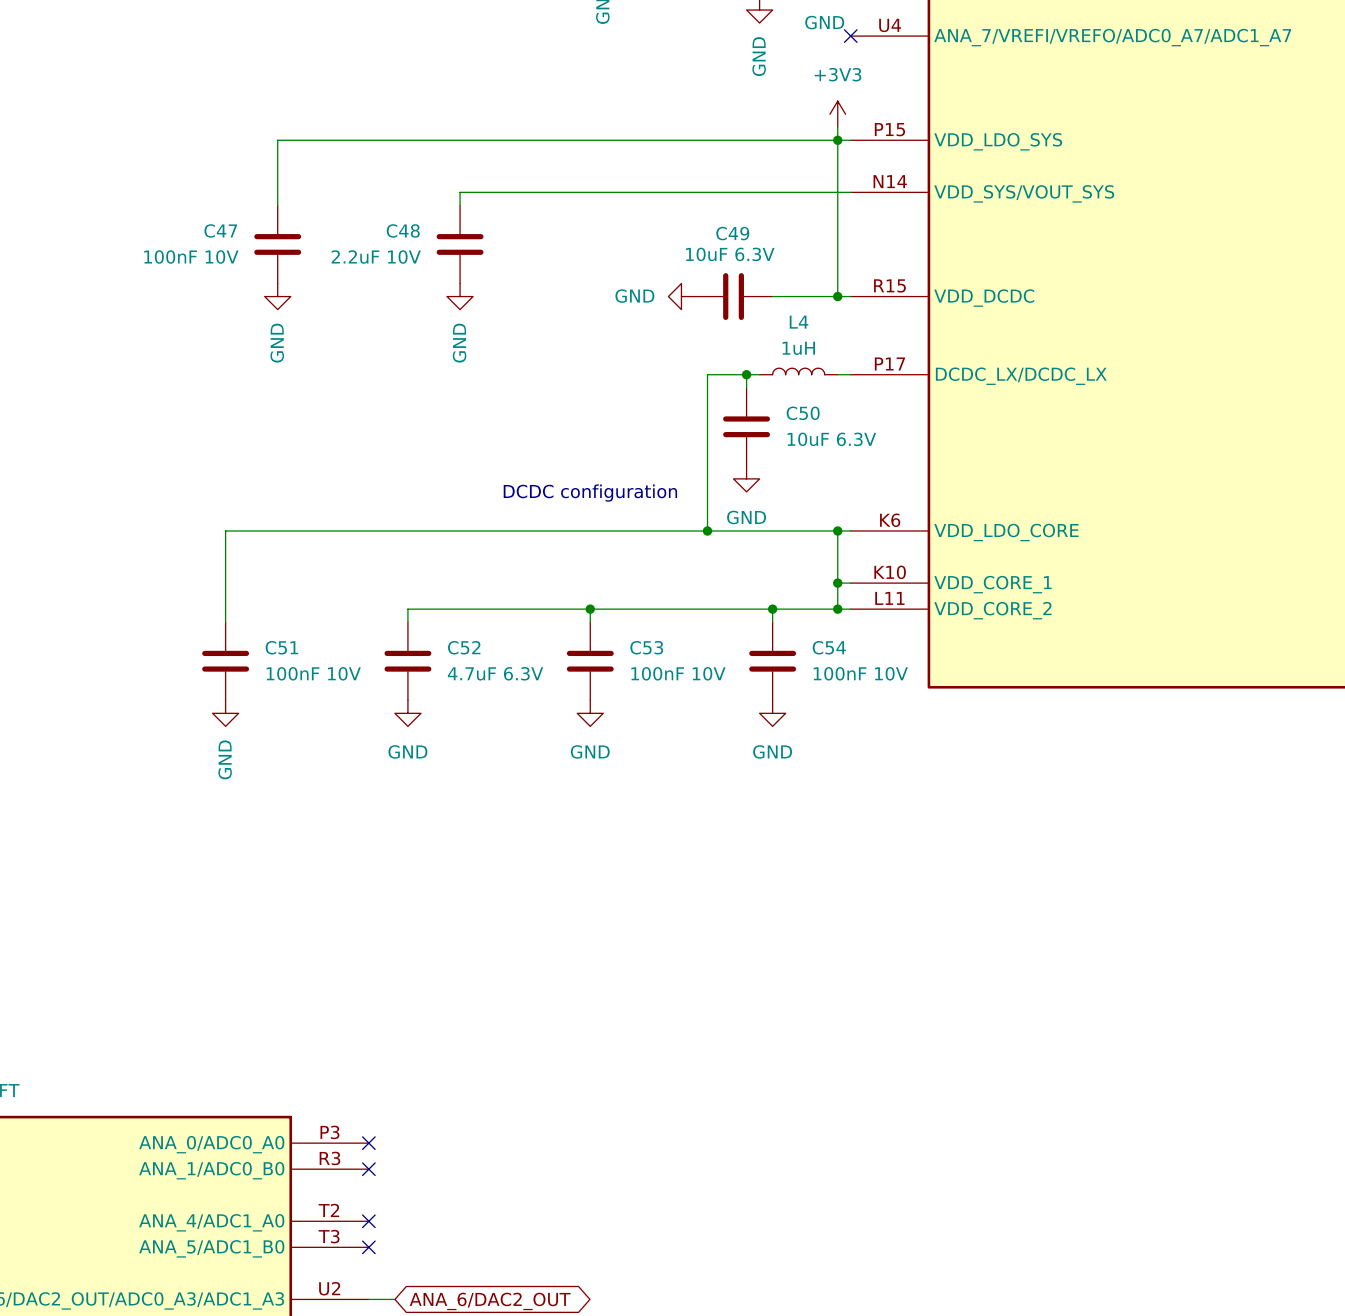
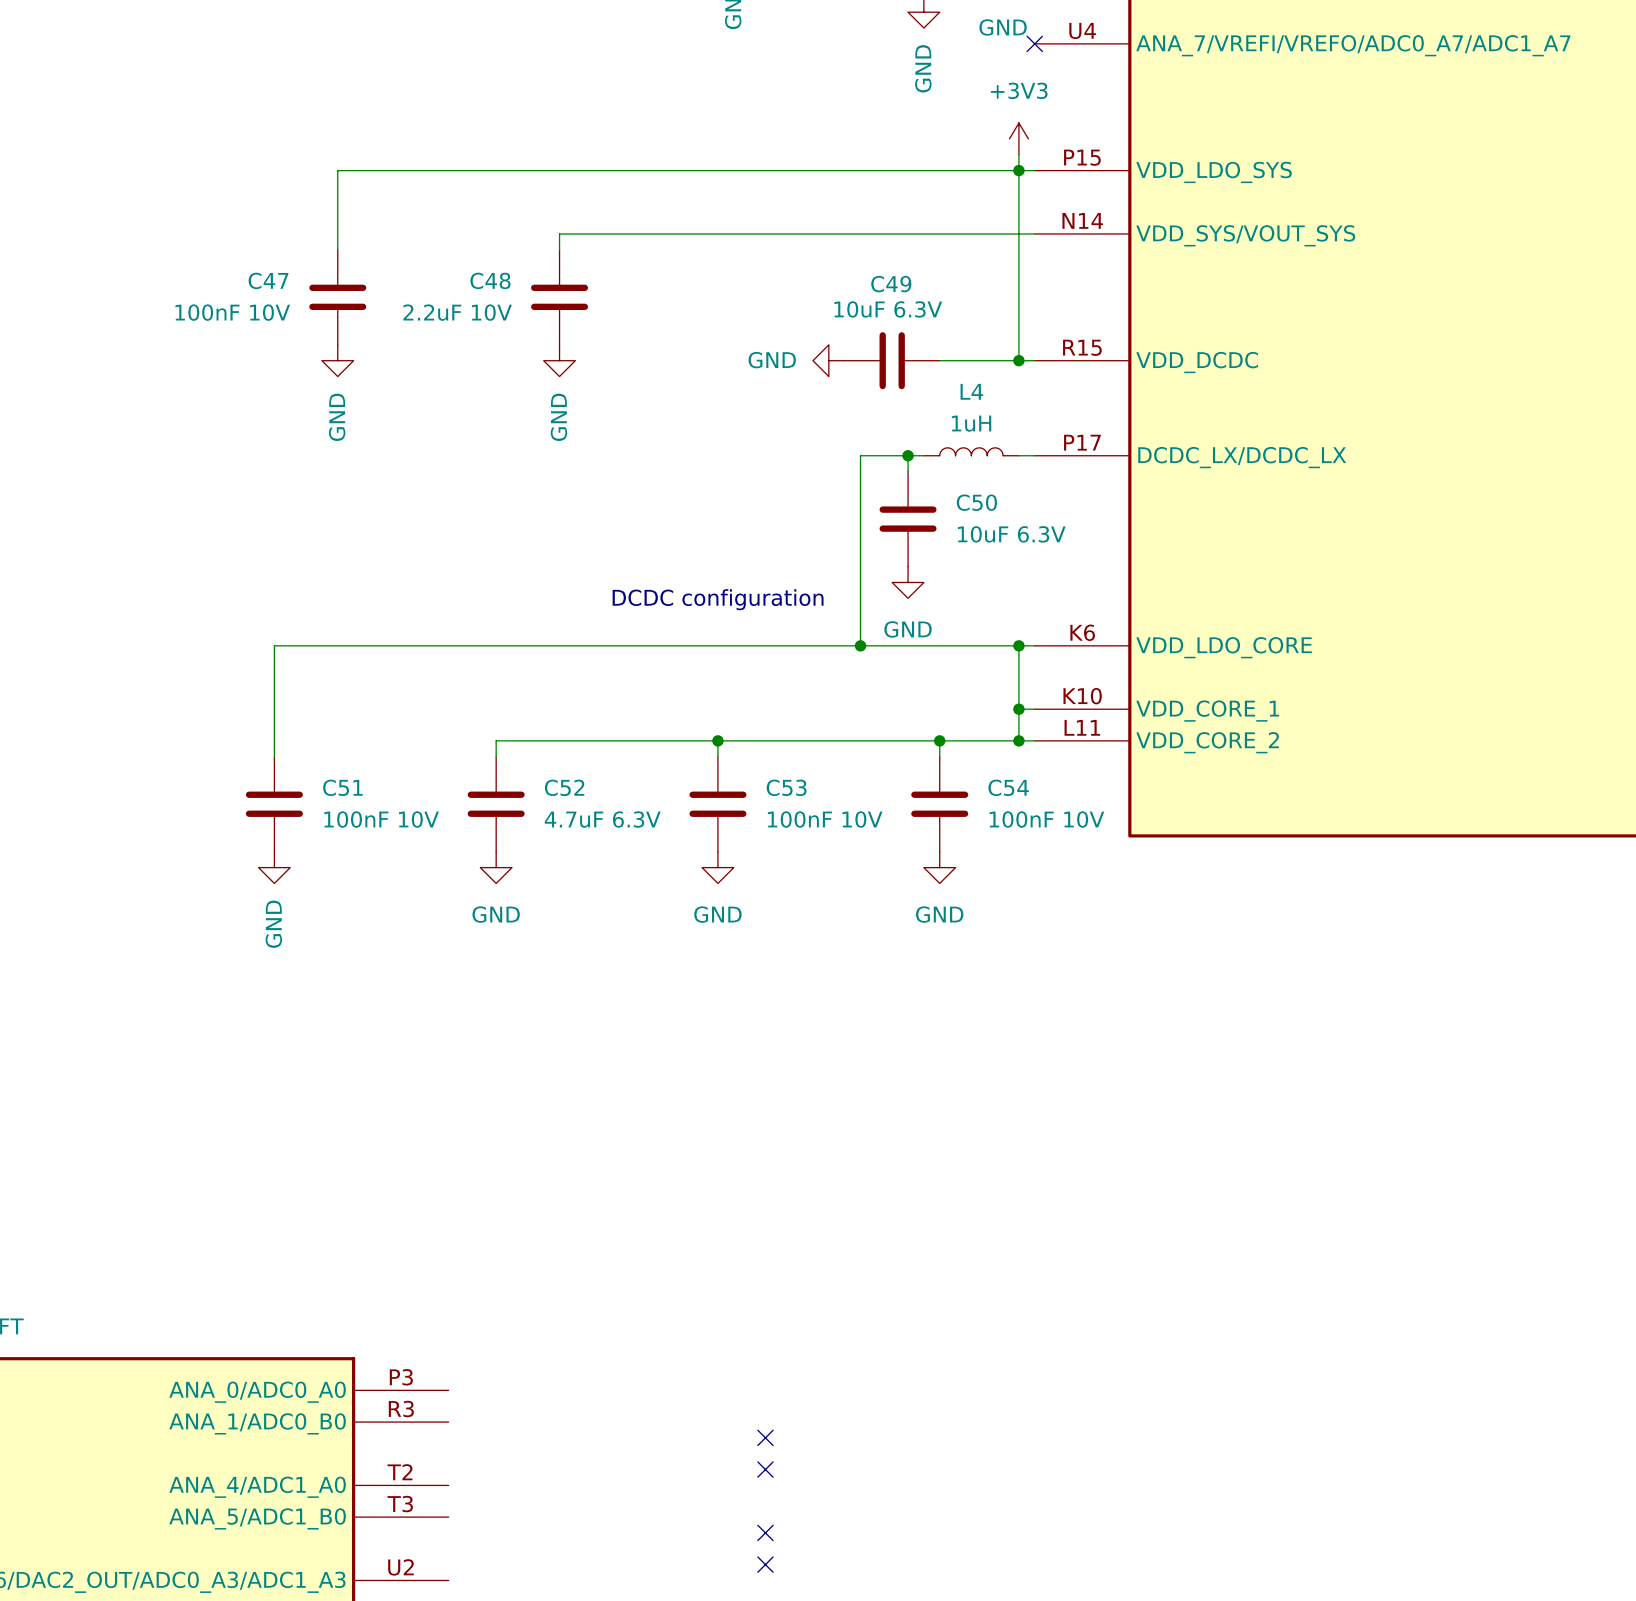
no-connect mark: (368, 1143) -> none
no-connect mark: (368, 1169) -> none
no-connect mark: none -> (765, 1437)
no-connect mark: none -> (765, 1469)
no-connect mark: (368, 1221) -> none
no-connect mark: (368, 1247) -> none
no-connect mark: none -> (765, 1532)
no-connect mark: none -> (765, 1564)
wire: (368, 1299) (394, 1299) -> none
global label: ANA_6/DAC2_OUT (490, 1301) -> none

